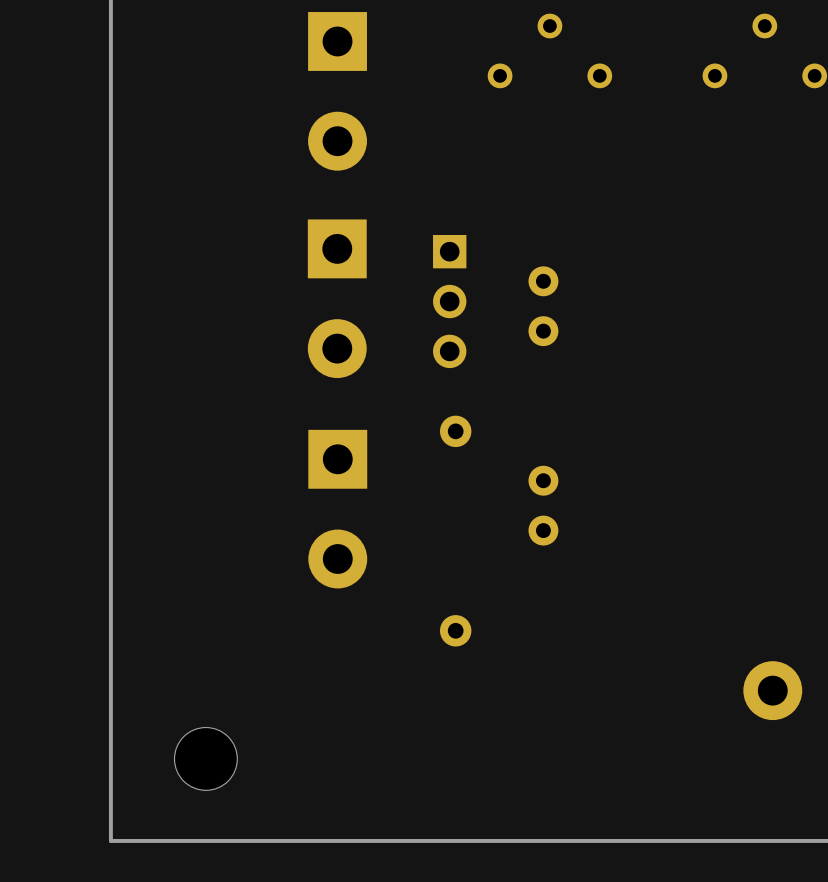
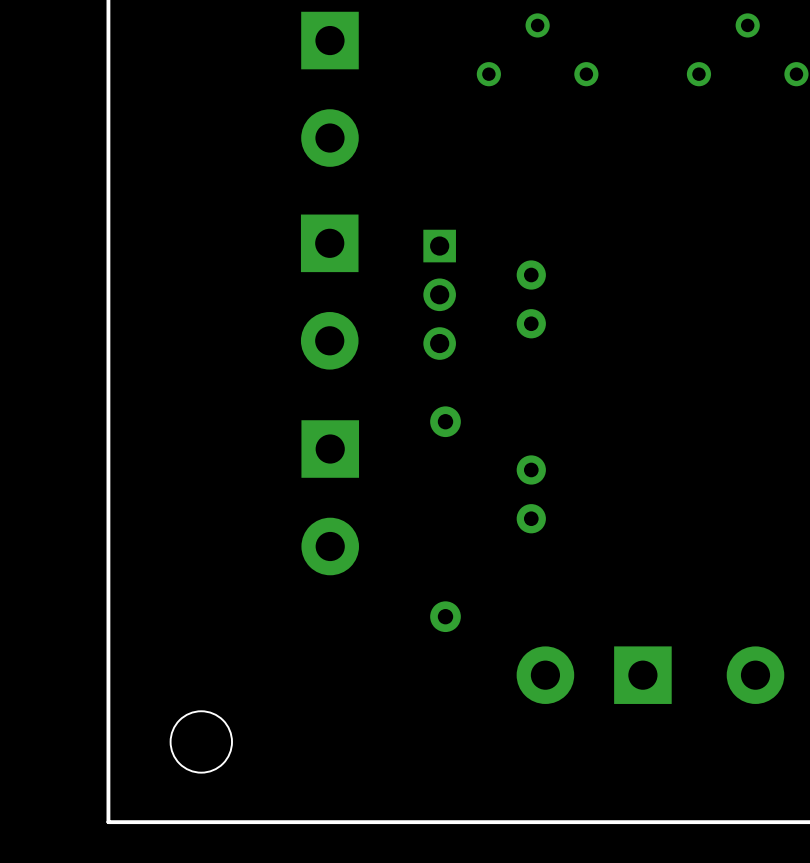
part: none -> (594, 675)

